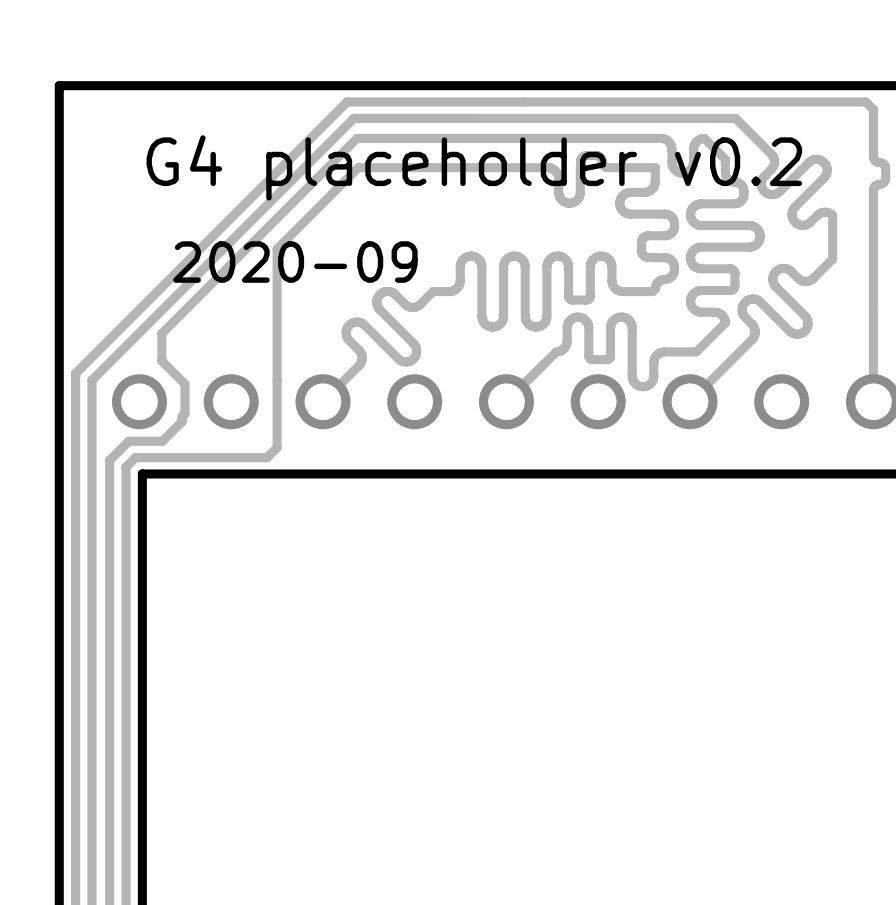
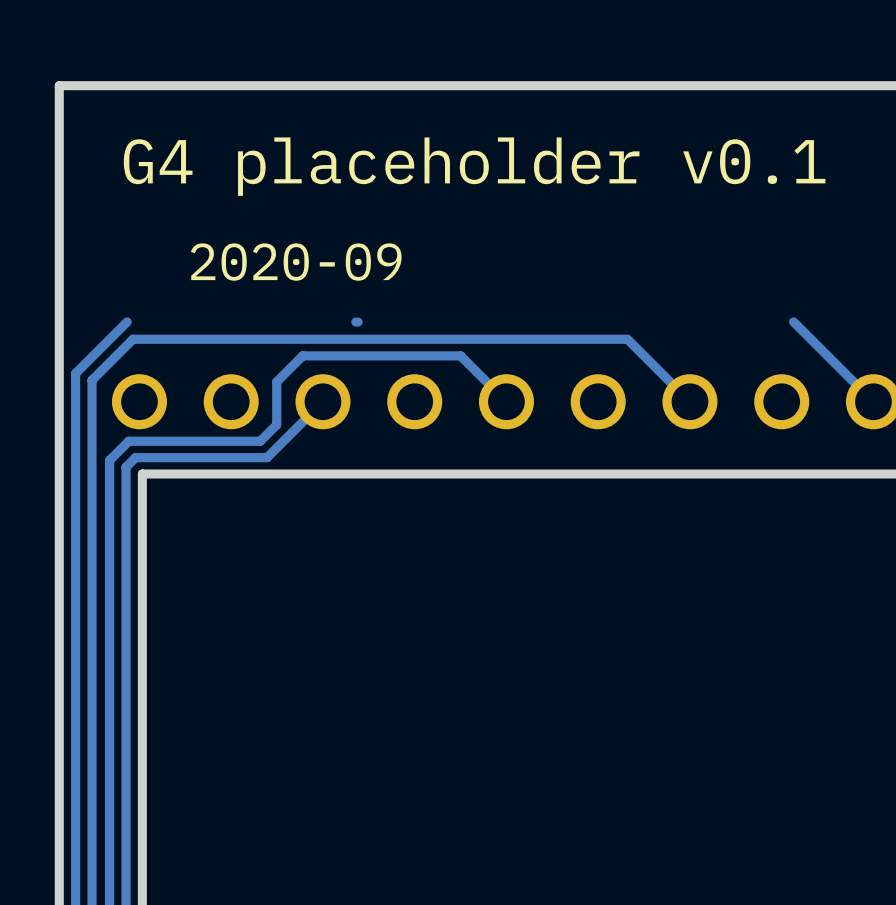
text: G4 placeholder v0.2 (474, 167) -> G4 placeholder v0.1 (474, 166)
track: (580, 167) (581, 159) (586, 155) (598, 156) (603, 165) (606, 167) (655, 167) (655, 183) (652, 188) (646, 192) (625, 193) (620, 198) (619, 203) (622, 210) (628, 213) (667, 214) (673, 219) (674, 228) (670, 233) (664, 235) (646, 235) (641, 241) (641, 252) (644, 255) (667, 257) (674, 265) (672, 275) (658, 281) (652, 291) (622, 291) (616, 289) (612, 283) (610, 262) (605, 257) (601, 256) (594, 258) (590, 264) (589, 298) (570, 299) (568, 295) (567, 262) (562, 257) (555, 256) (551, 258) (547, 264) (546, 318) (540, 326) (533, 326) (529, 324) (525, 318) (524, 264) (519, 257) (512, 256) (505, 260) (503, 264) (503, 318) (497, 326) (490, 326) (484, 323) (482, 318) (481, 264) (477, 258) (471, 256) (466, 257) (461, 262) (459, 283) (454, 290) (433, 291) (420, 304) (413, 307) (406, 305) (391, 291) (384, 291) (378, 296) (376, 300) (378, 307) (415, 345) (416, 352) (411, 360) (407, 361) (400, 360) (364, 325) (358, 322) -> none
track: (580, 167) (580, 194) (576, 200) (569, 203) (564, 202) (559, 197) (558, 176) (556, 171) (550, 167) (358, 167) (277, 248) (277, 447) -> none
track: (127, 321) (347, 102) (865, 102) (873, 109) (873, 157) (876, 162) (883, 163) (885, 168) (885, 180) (875, 185) (873, 190) (873, 401) -> (793, 321) (873, 401)
track: (355, 322) (349, 325) (346, 334) (347, 338) (360, 352) (361, 361) (322, 401) -> (277, 447) (322, 401)
track: (133, 339) (353, 118) (735, 118) (773, 158) (772, 167) (761, 182) (763, 189) (766, 193) (770, 194) (777, 193) (810, 161) (817, 159) (825, 164) (827, 171) (825, 175) (795, 206) (792, 215) (795, 222) (804, 225) (821, 212) (826, 212) (832, 215) (832, 259) (809, 280) (799, 279) (784, 268) (777, 269) (773, 275) (774, 284) (806, 317) (808, 324) (803, 332) (798, 334) (791, 332) (758, 300) (751, 299) (745, 302) (742, 306) (742, 313) (754, 328) (753, 337) (689, 401) -> (133, 339) (627, 339) (689, 401)
track: (506, 401) (556, 351) (564, 347) (566, 343) (567, 325) (573, 318) (580, 317) (587, 323) (588, 356) (592, 359) (609, 358) (611, 323) (618, 317) (628, 319) (632, 327) (632, 378) (636, 384) (643, 386) (647, 385) (652, 380) (654, 360) (657, 354) (664, 351) (696, 351) (725, 323) (724, 318) (719, 313) (694, 309) (690, 303) (690, 298) (692, 294) (698, 290) (732, 290) (734, 286) (734, 271) (730, 268) (696, 267) (690, 260) (691, 253) (696, 248) (701, 247) (751, 246) (759, 241) (759, 233) (757, 229) (751, 225) (701, 225) (696, 224) (691, 219) (690, 212) (696, 204) (736, 203) (743, 196) (741, 185) (730, 181) (726, 176) (725, 159) (704, 138) (699, 139) (694, 144) (692, 167) (687, 172) (682, 173) (678, 172) (672, 167) (670, 144) (665, 139) (661, 138) (356, 138) (161, 333) (161, 360) (184, 384) (184, 413) (182, 416) (182, 421) (162, 441) -> (506, 401) (460, 355) (302, 355) (276, 381) (276, 424) (260, 441) (162, 441)

